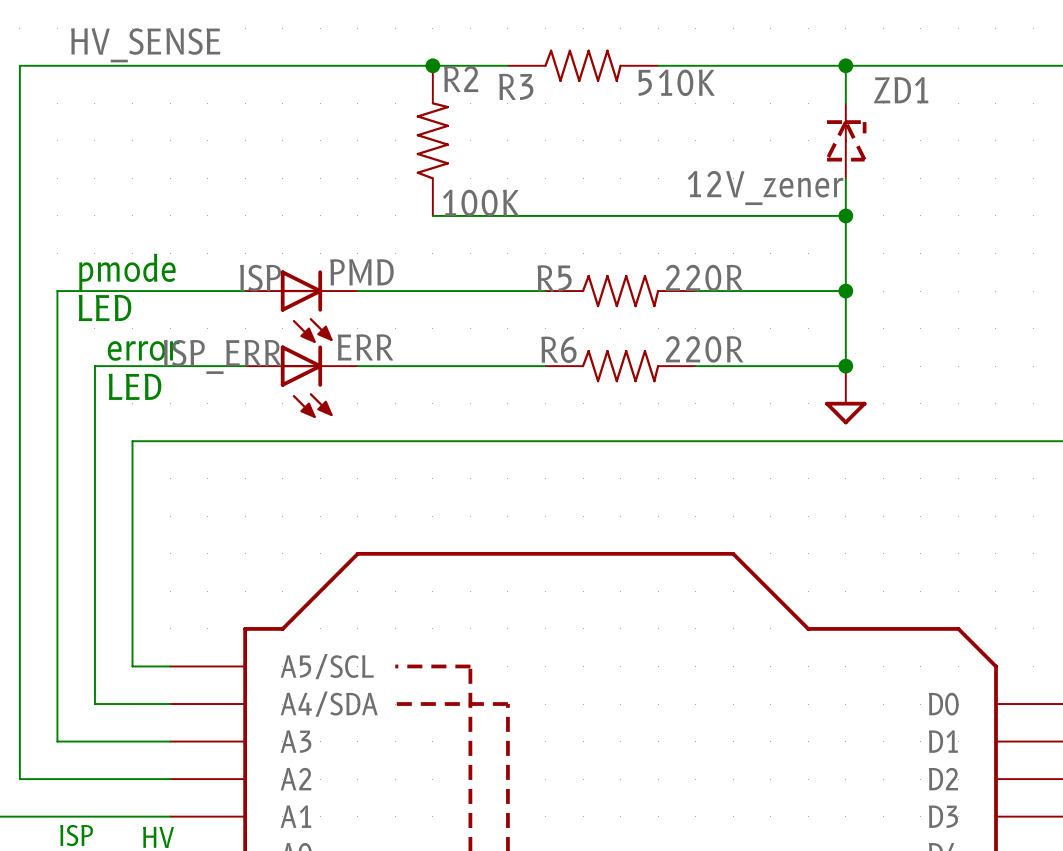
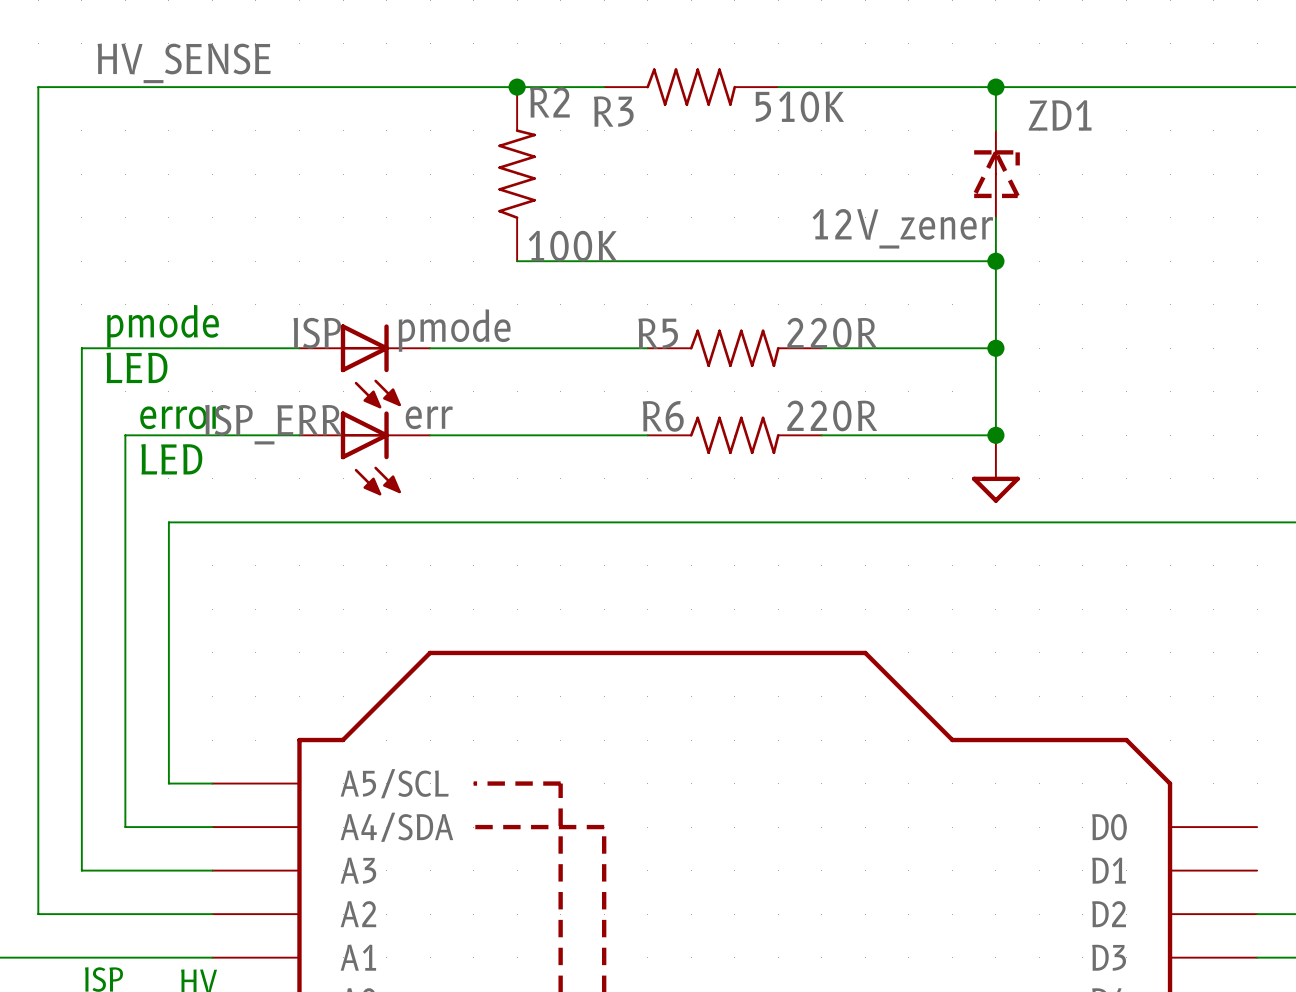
ISP value: PMD (361, 272) -> pmode (454, 330)
ISP_ERR value: ERR (365, 347) -> err (429, 417)

